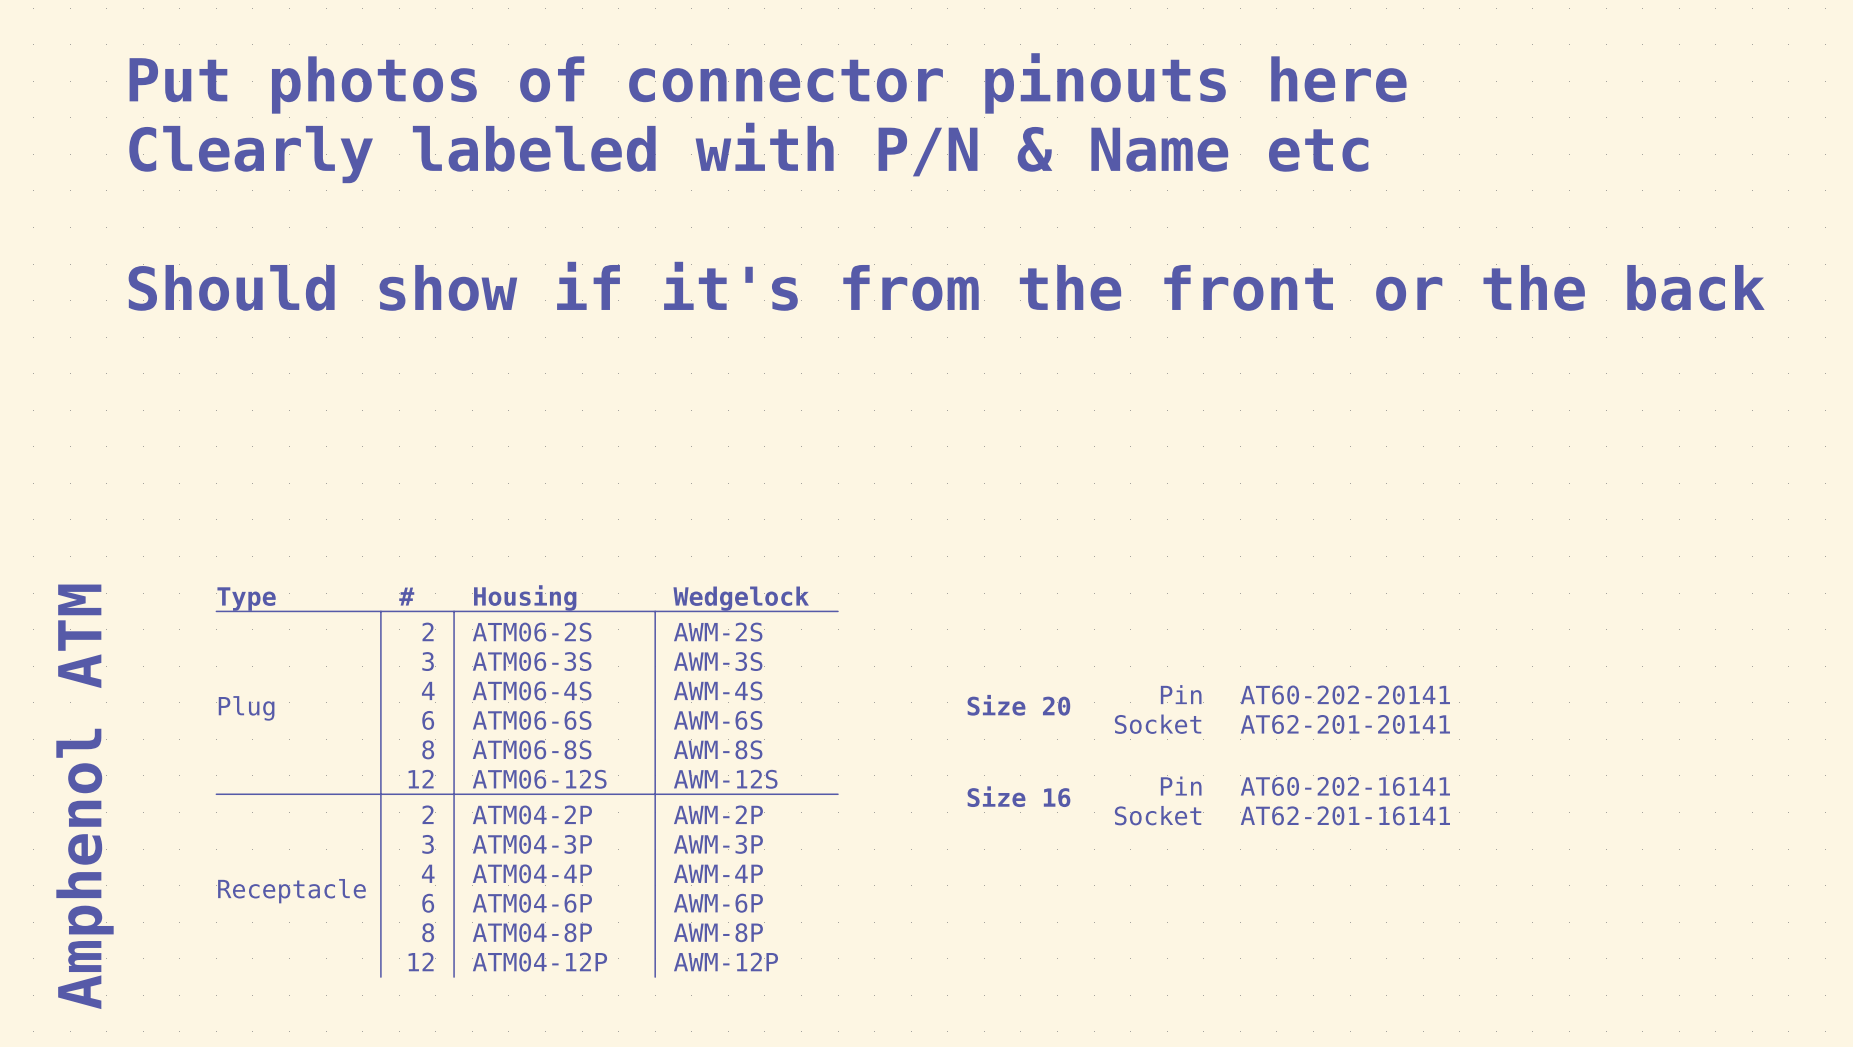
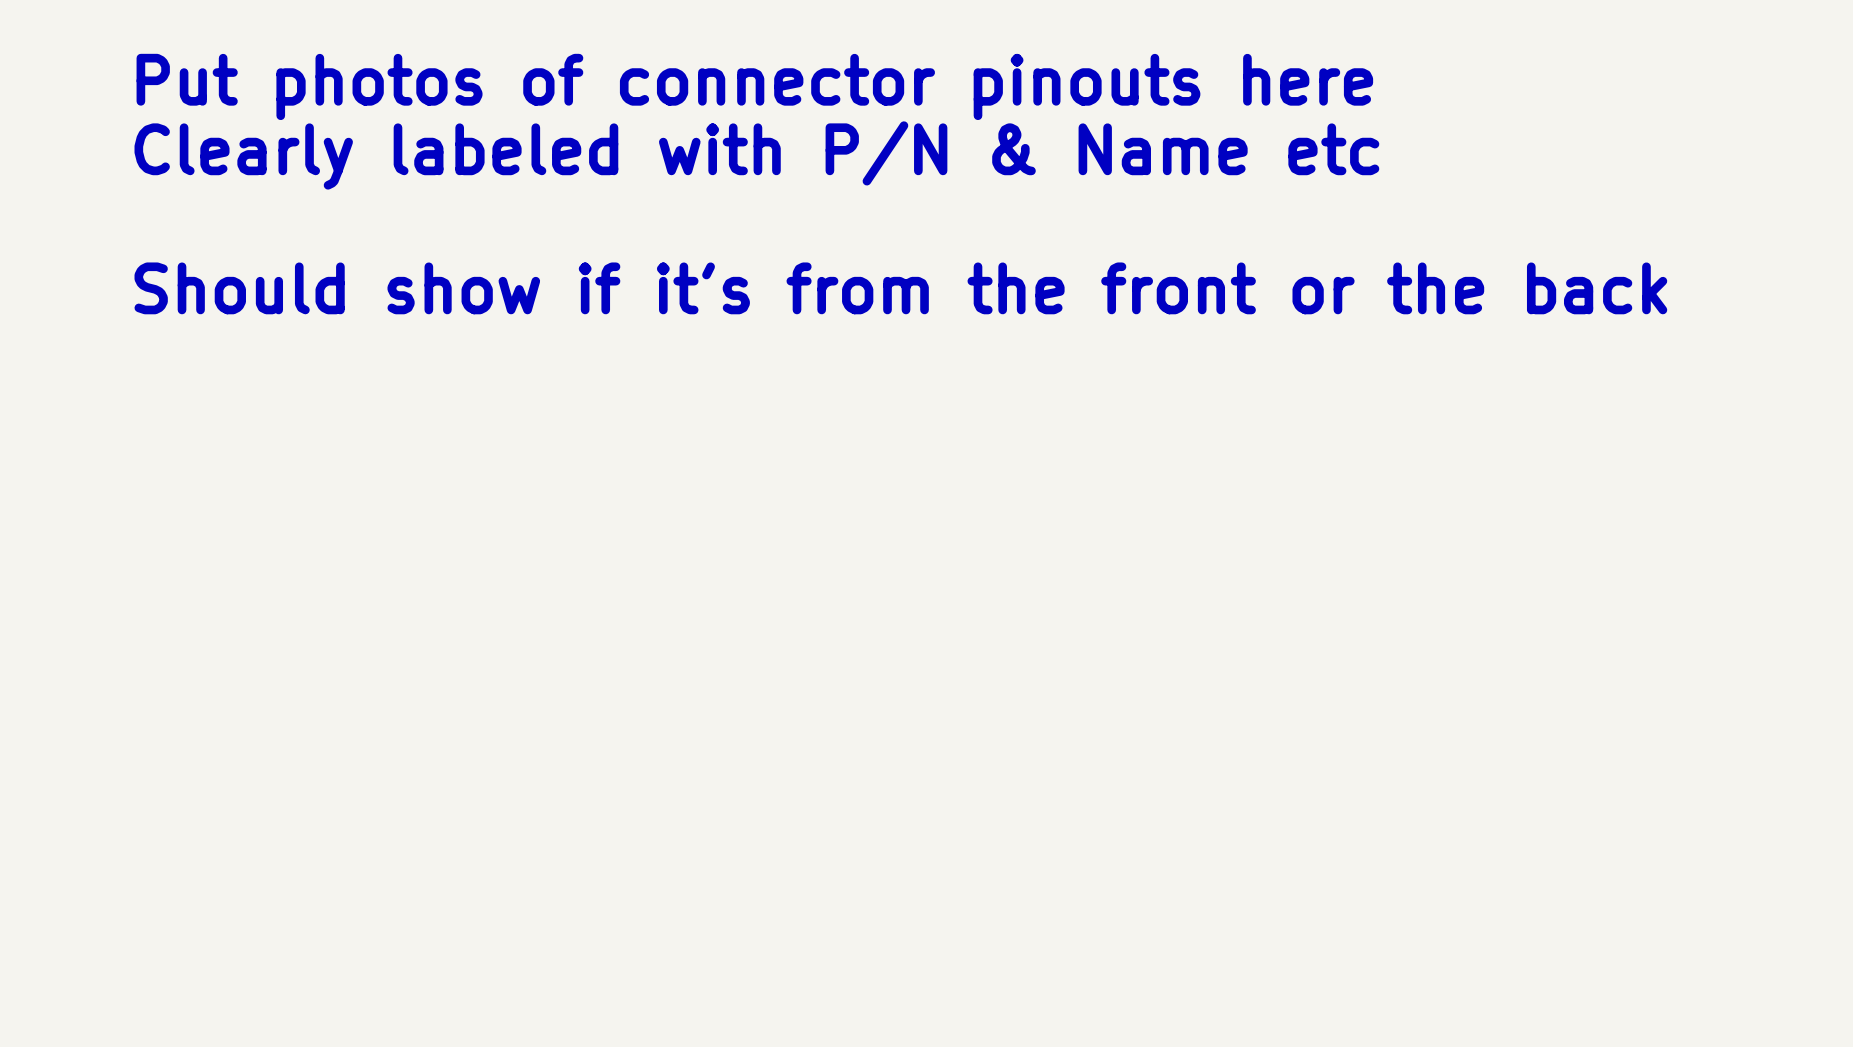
text: # (406, 596) -> none
text: Housing (525, 597) -> none
text: Wedgelock (741, 598) -> none
text: Type (246, 599) -> none
line: (216, 611) (838, 611) -> none
line: (380, 611) (380, 977) -> none
line: (454, 611) (454, 977) -> none
line: (655, 611) (655, 977) -> none
text: 2 (428, 631) -> none
text: ATM06-2S (532, 632) -> none
text: AWM-2S (718, 632) -> none
text: 3 (428, 661) -> none
text: ATM06-3S (532, 661) -> none
text: AWM-3S (718, 661) -> none
text: 4 (428, 690) -> none
text: ATM06-4S (532, 690) -> none
text: AWM-4S (718, 690) -> none
text: Pin (1181, 694) -> none
text: AT60-202-20141 (1345, 695) -> none
text: Size 20 (1018, 705) -> none
text: Plug (246, 708) -> none
text: 6 (428, 720) -> none
text: ATM06-6S (532, 720) -> none
text: AWM-6S (718, 720) -> none
text: Socket (1158, 724) -> none
text: AT62-201-20141 (1345, 724) -> none
text: 8 (428, 749) -> none
text: ATM06-8S (532, 749) -> none
text: AWM-8S (718, 749) -> none
text: 12 (421, 779) -> none
text: ATM06-12S (539, 779) -> none
text: AWM-12S (725, 779) -> none
text: Pin (1181, 786) -> none
text: AT60-202-16141 (1345, 786) -> none
line: (216, 794) (838, 794) -> none
text: Amphenol ATM (85, 796) -> none
text: Size 16 (1018, 796) -> none
text: 2 (428, 814) -> none
text: ATM04-2P (532, 814) -> none
text: AWM-2P (718, 814) -> none
text: Socket (1158, 815) -> none
text: AT62-201-16141 (1345, 815) -> none
text: 3 (428, 844) -> none
text: ATM04-3P (532, 844) -> none
text: AWM-3P (718, 844) -> none
text: 4 (428, 873) -> none
text: ATM04-4P (532, 873) -> none
text: AWM-4P (718, 873) -> none
text: Receptacle (291, 891) -> none
text: 6 (428, 903) -> none
text: ATM04-6P (532, 903) -> none
text: AWM-6P (718, 903) -> none
text: 8 (428, 932) -> none
text: ATM04-8P (532, 932) -> none
text: AWM-8P (718, 932) -> none
text: 12 (421, 961) -> none
text: AWM-12P (725, 961) -> none
text: ATM04-12P (539, 962) -> none

